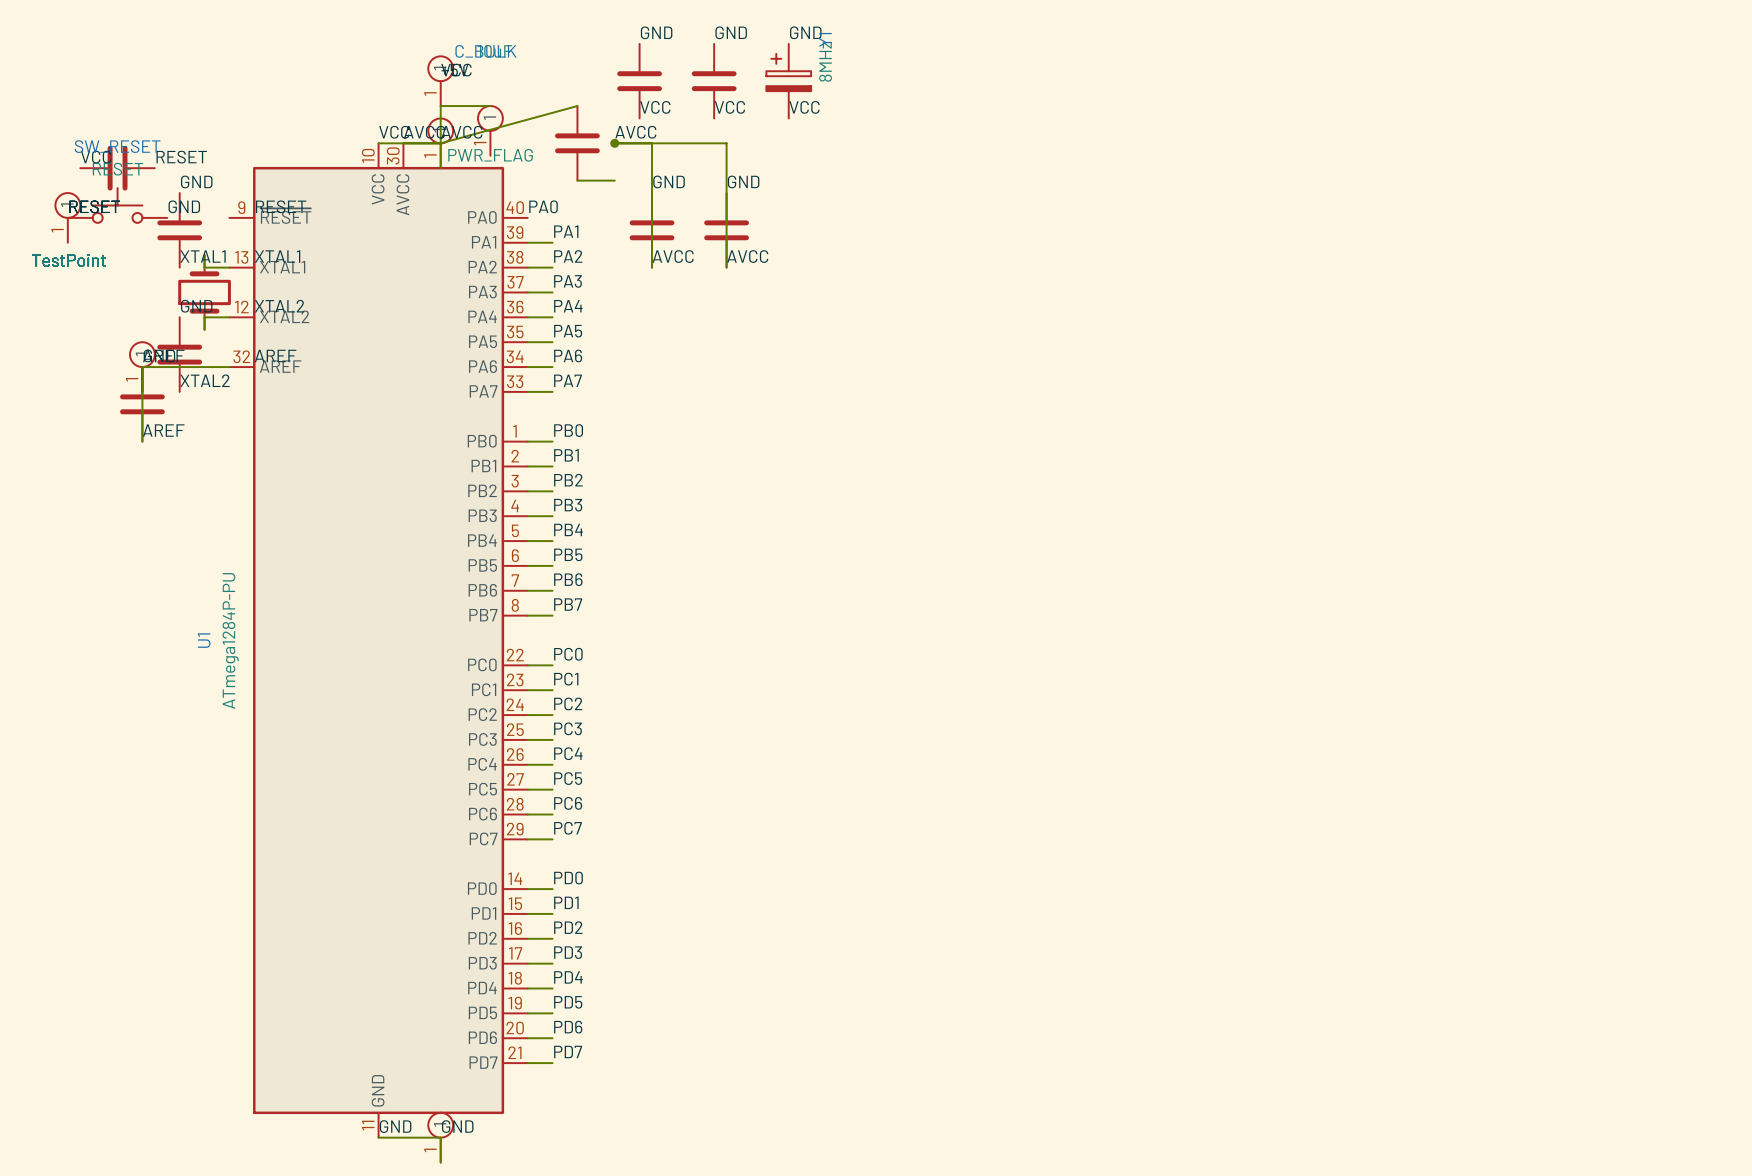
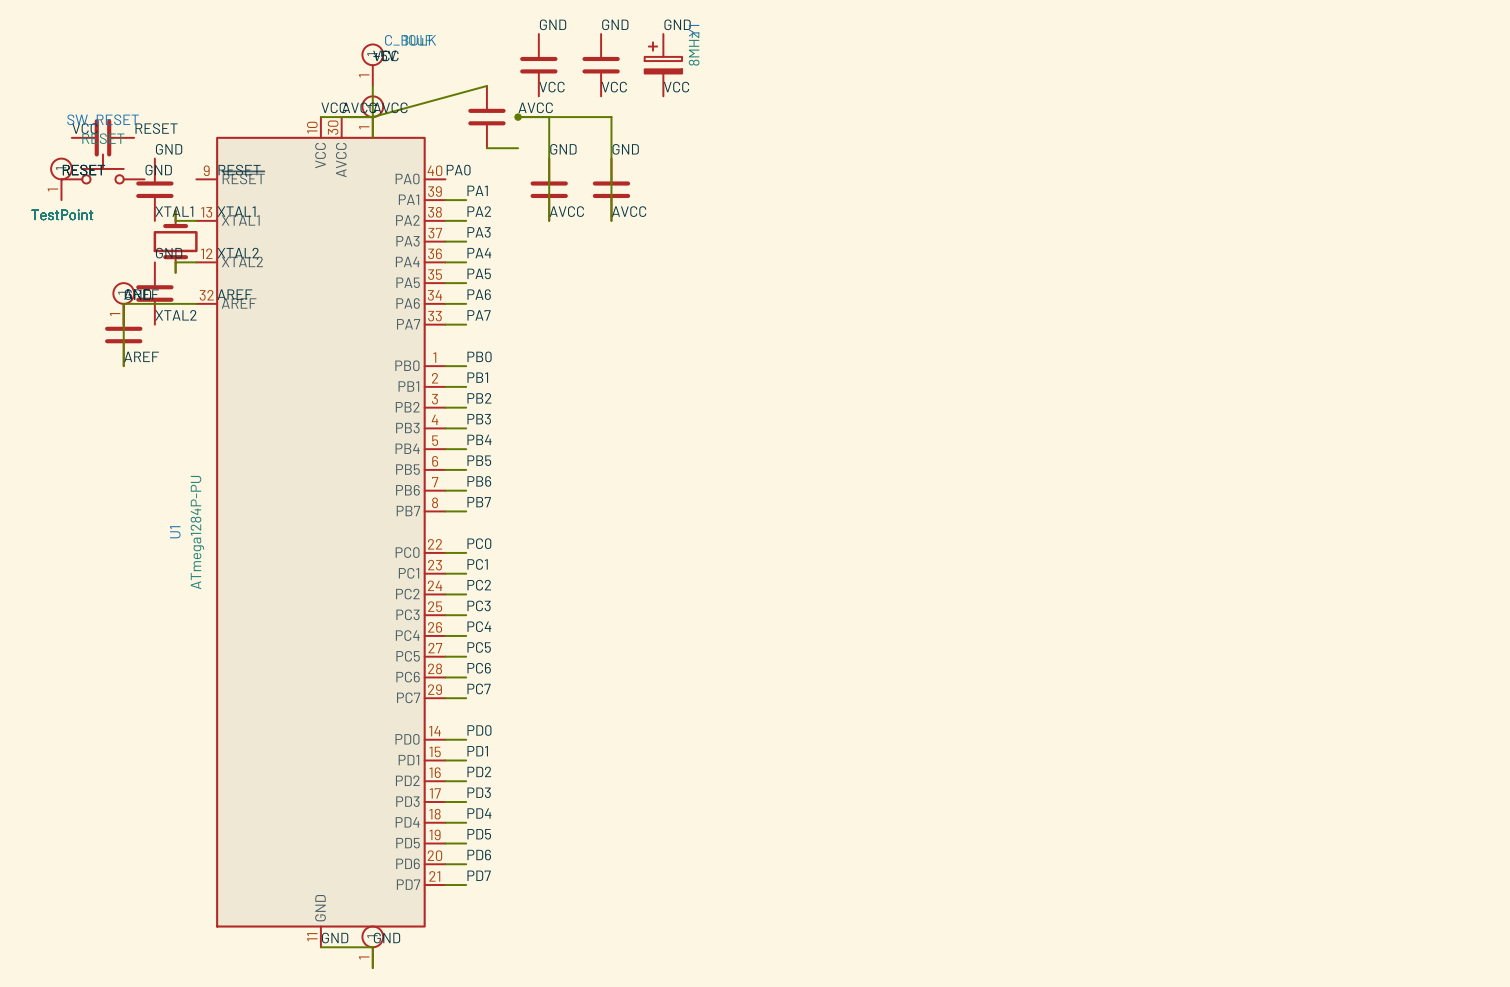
wire: (440, 106) (490, 106) -> none
power symbol: PWR_FLAG (490, 130) -> none

